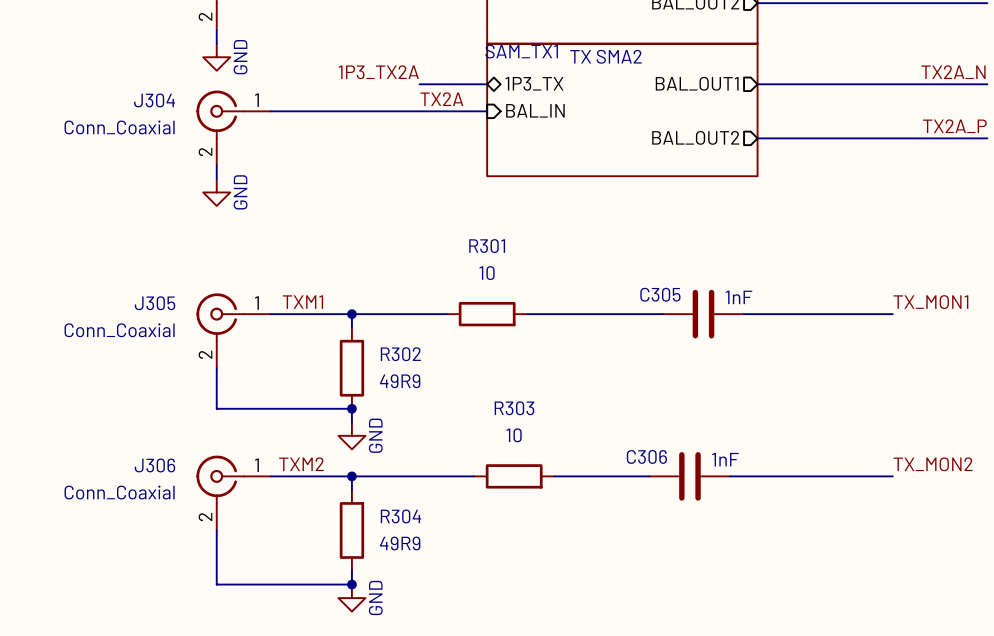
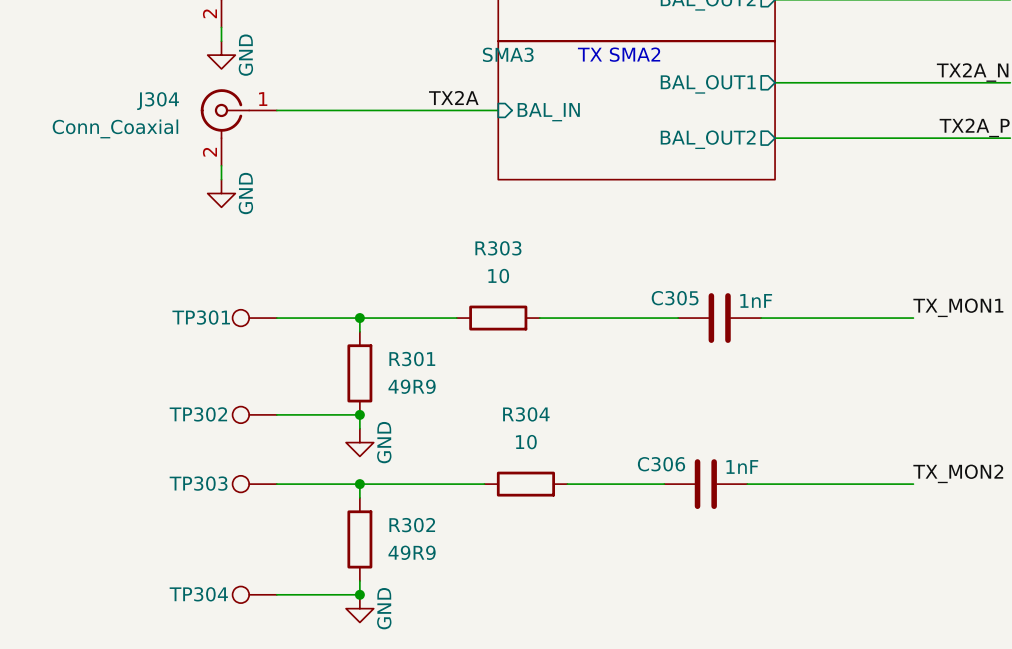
label: 1P3_TX2A (378, 72) -> none
sheet pin: 1P3_TX (534, 83) -> none
wire: (419, 84) (487, 84) -> none
sheet SAM_TX1: (622, 109) -> none
sheet SMA3: none -> (636, 110)
R301 name: R301 (487, 246) -> R303 (498, 248)
label: TXM1 (302, 302) -> none
TP301: none -> (254, 318)
J305: Conn_Coaxial (233, 330) -> none
R302 name: R302 (400, 354) -> R301 (412, 359)
wire: (216, 368) (216, 408) (270, 408) -> none
TP302: none -> (254, 414)
R303 name: R303 (514, 408) -> R304 (526, 414)
label: TXM2 (301, 464) -> none
TP303: none -> (254, 484)
J306: Conn_Coaxial (233, 493) -> none
R304 name: R304 (400, 516) -> R302 (412, 525)
wire: (216, 530) (216, 584) (270, 584) -> none
TP304: none -> (254, 594)

